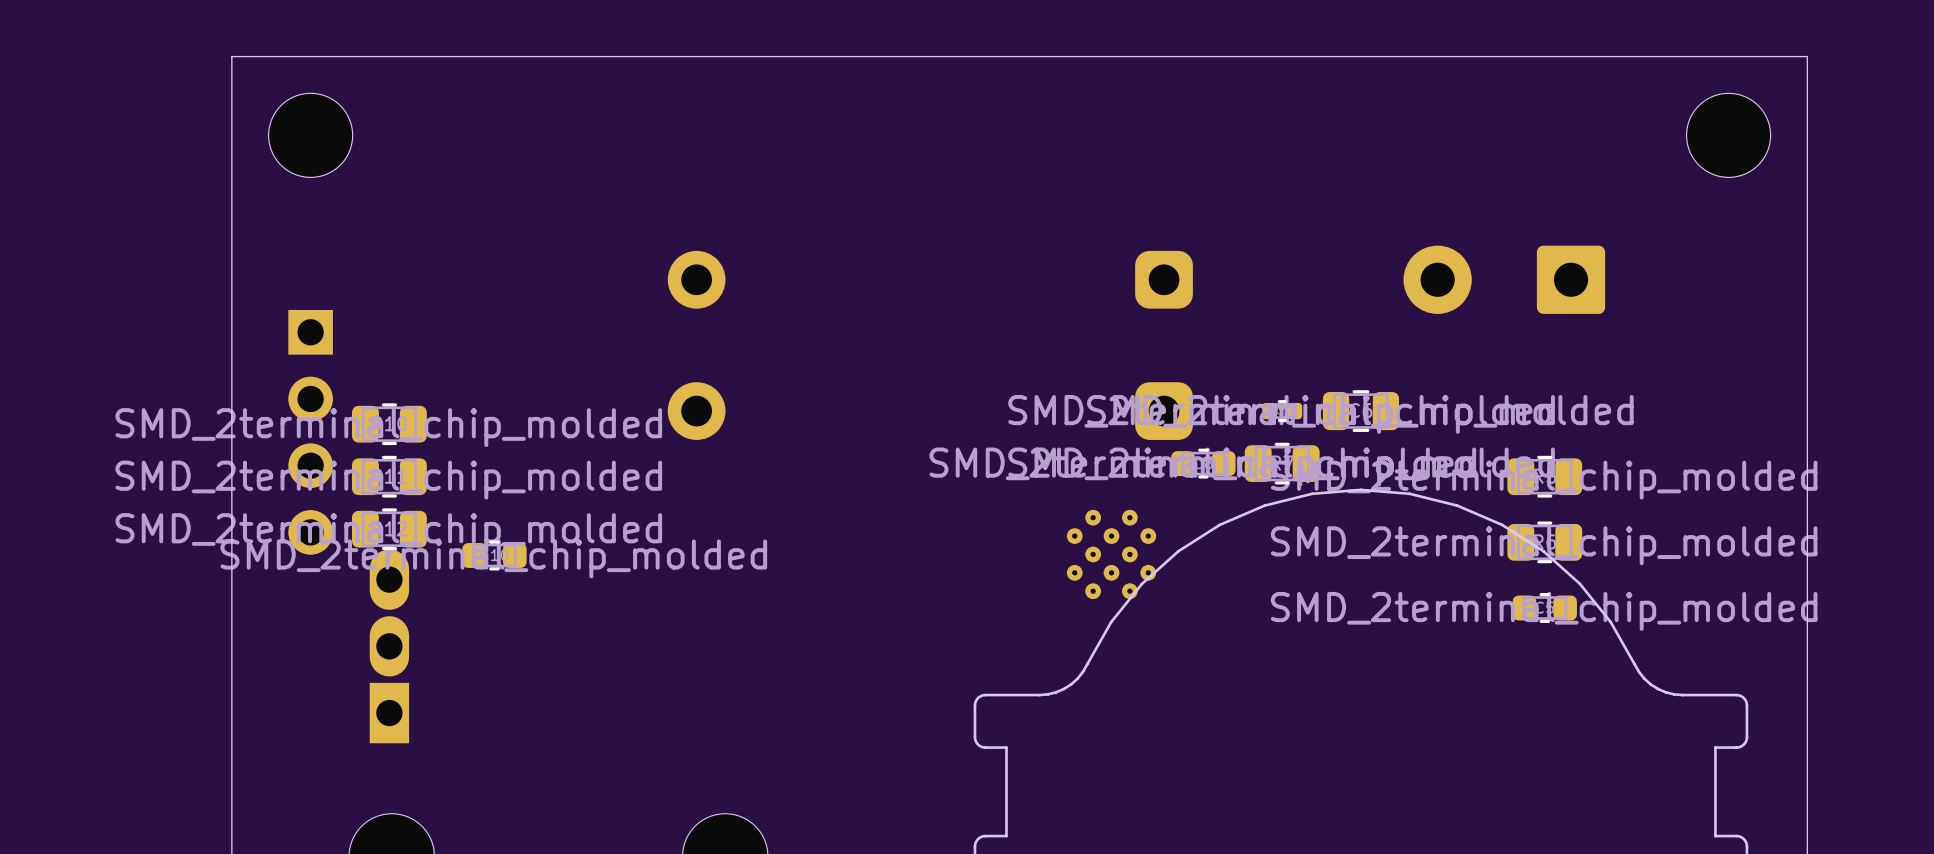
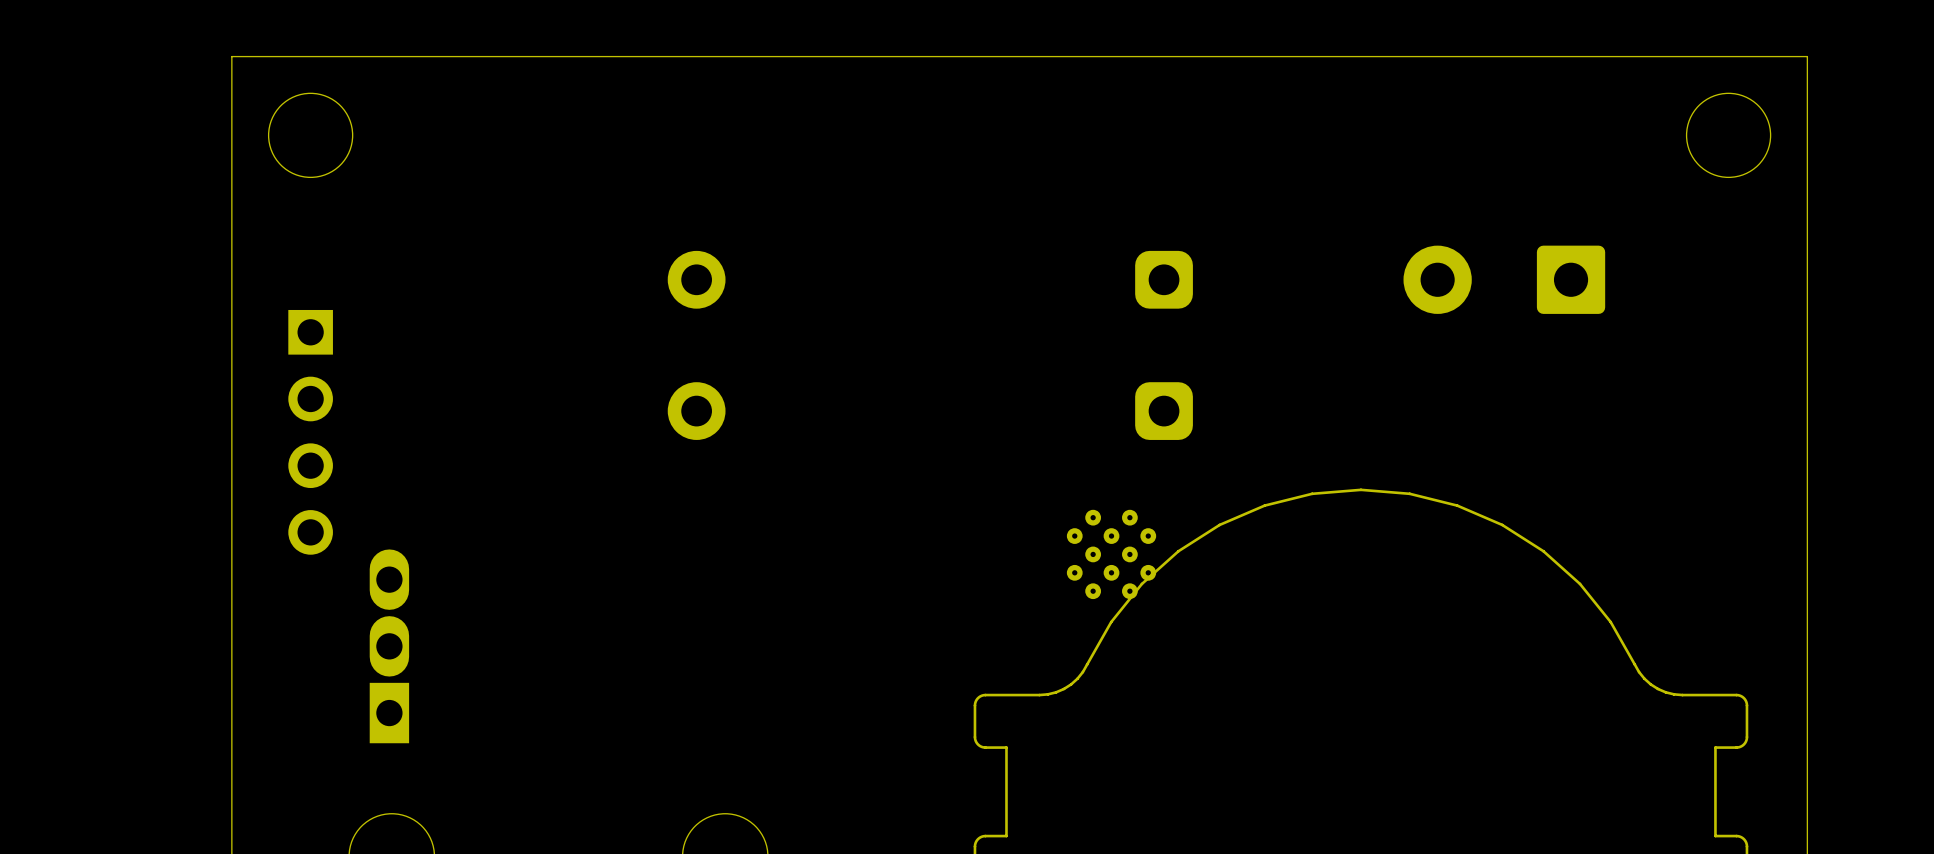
part: (1282, 411) -> none
part: (1360, 411) -> none
part: (389, 424) -> none
part: (1203, 463) -> none
part: (1282, 463) -> none
part: (389, 476) -> none
part: (1544, 476) -> none
part: (389, 529) -> none
part: (1544, 542) -> none
part: (494, 555) -> none
part: (1544, 608) -> none

